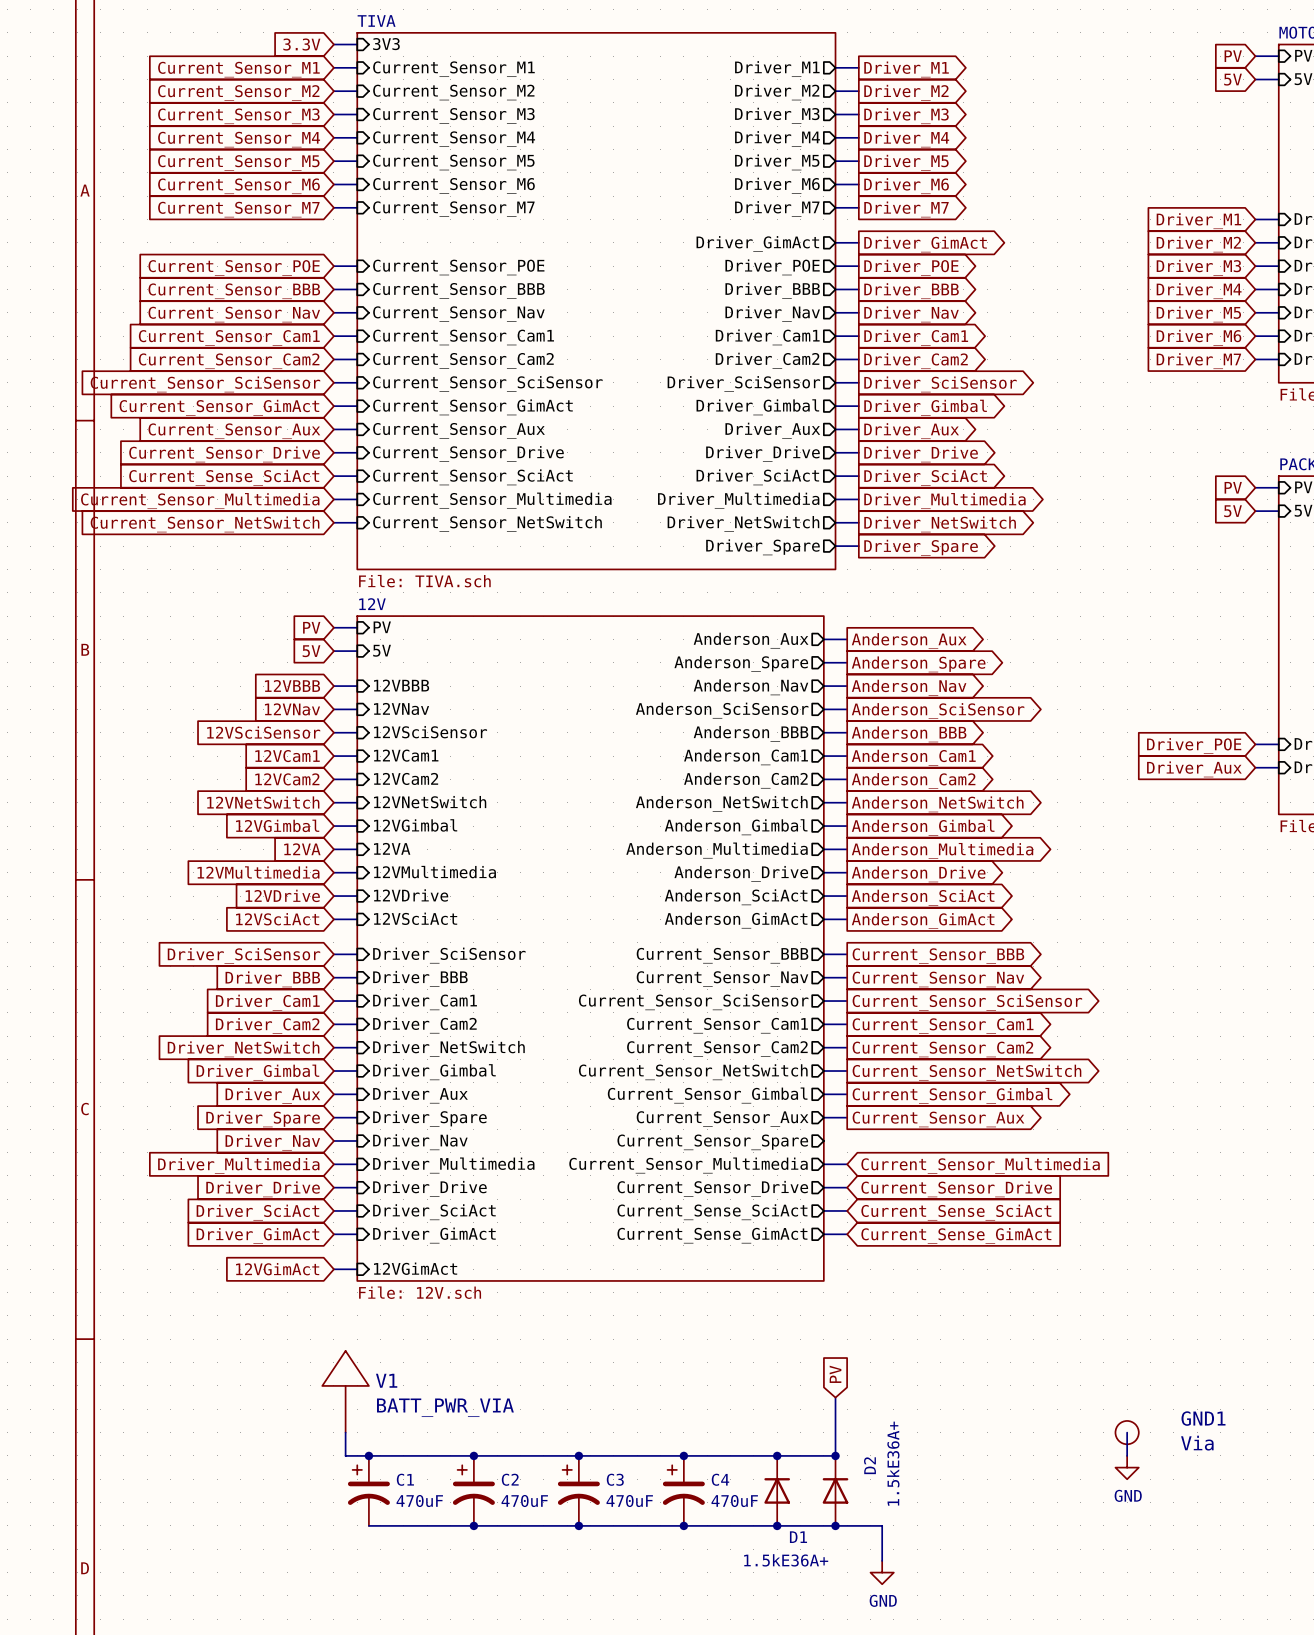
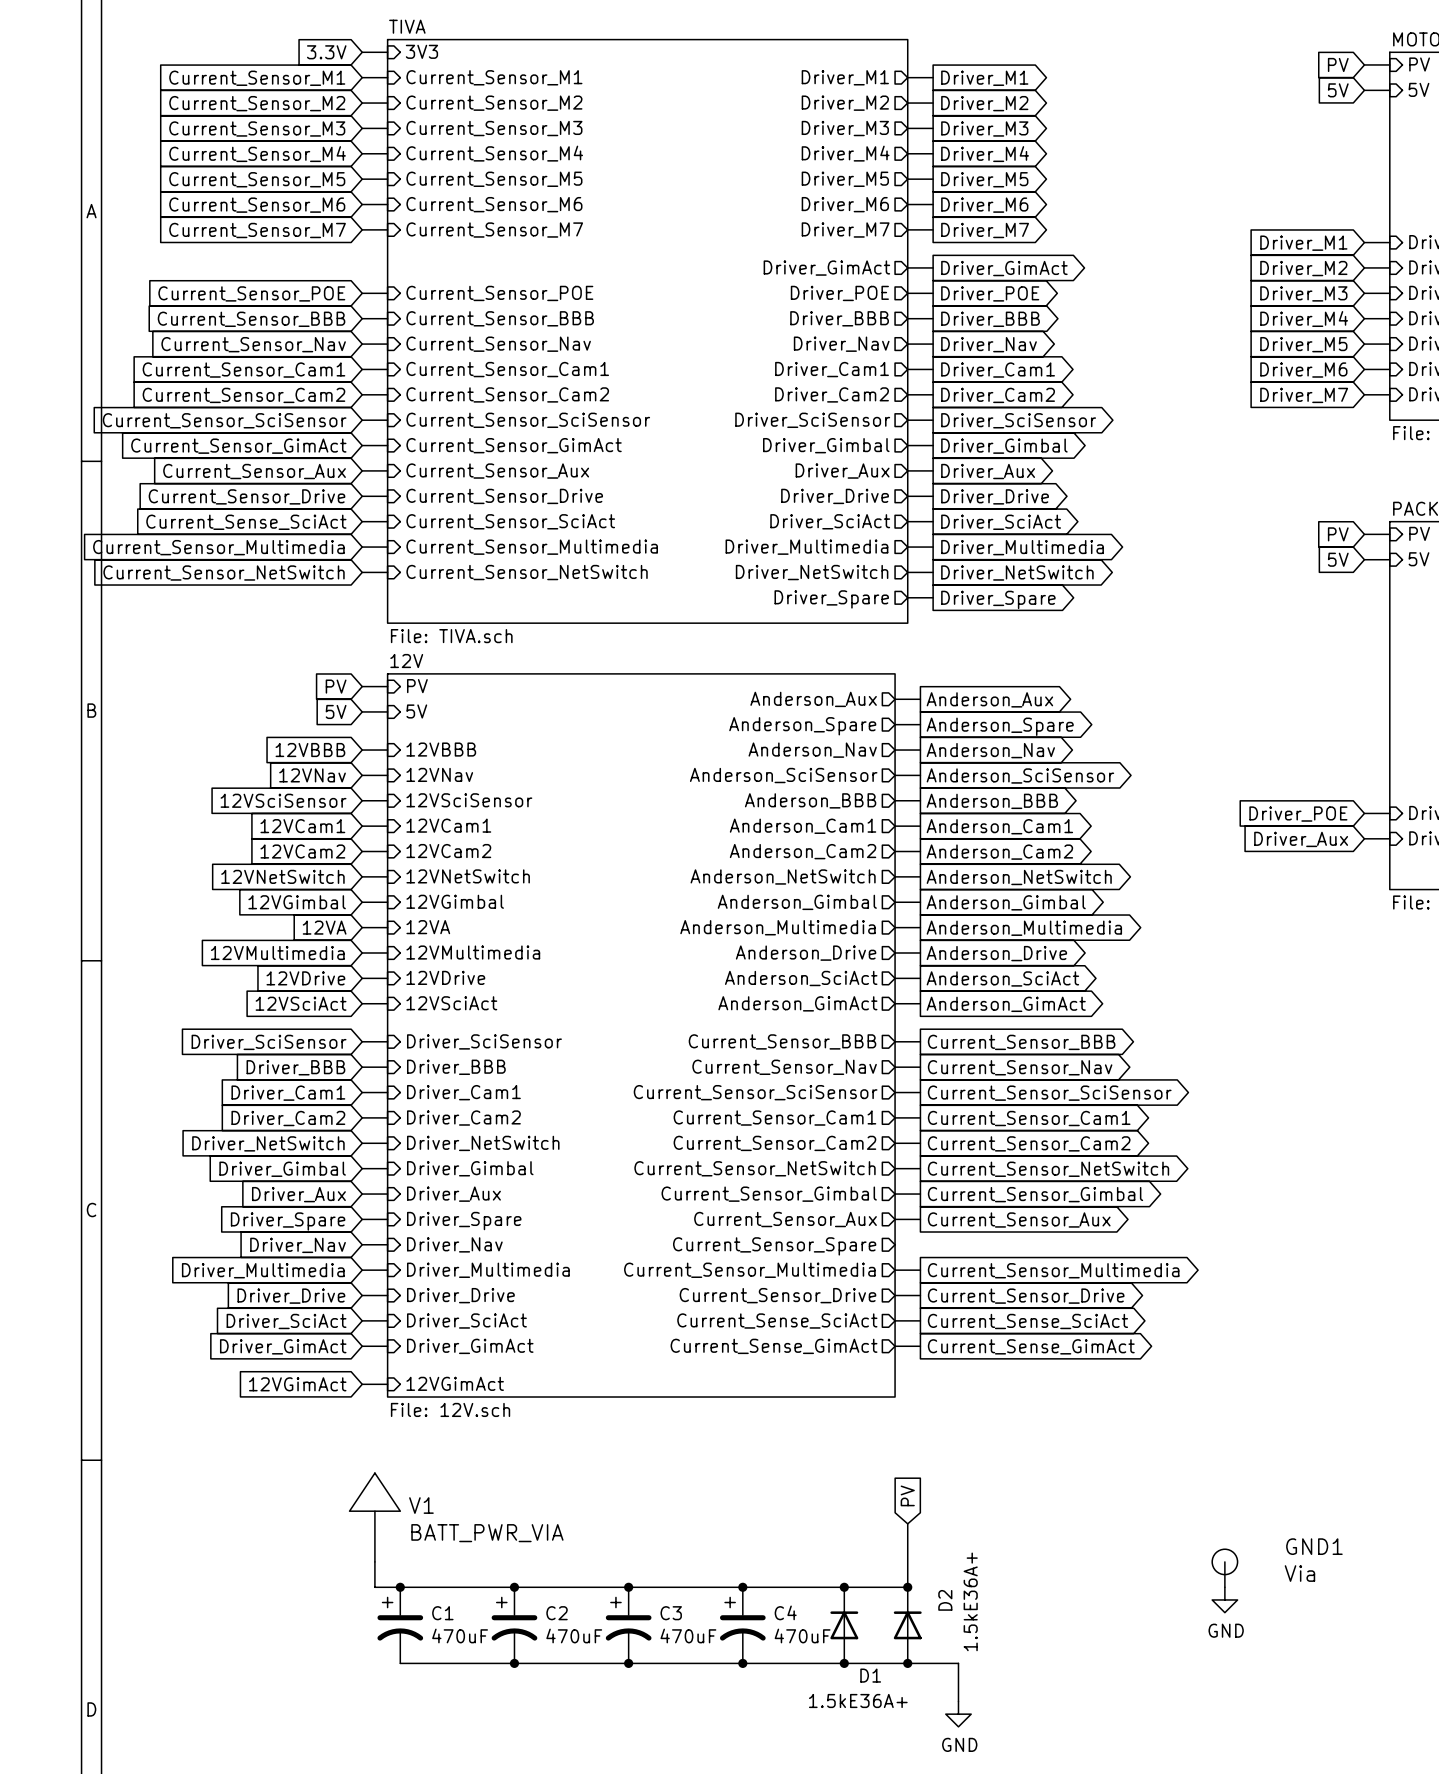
global label shape: input (980, 1165) -> output (1053, 1270)
global label shape: input (956, 1189) -> output (1026, 1296)
global label shape: input (956, 1212) -> output (1027, 1321)
global label shape: input (956, 1235) -> output (1031, 1346)

